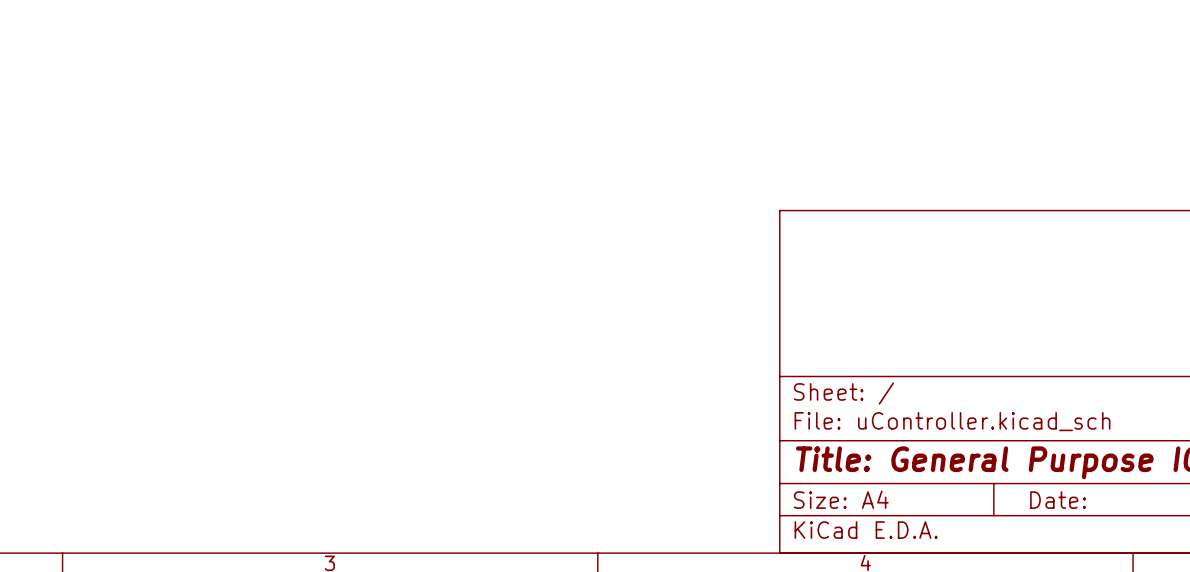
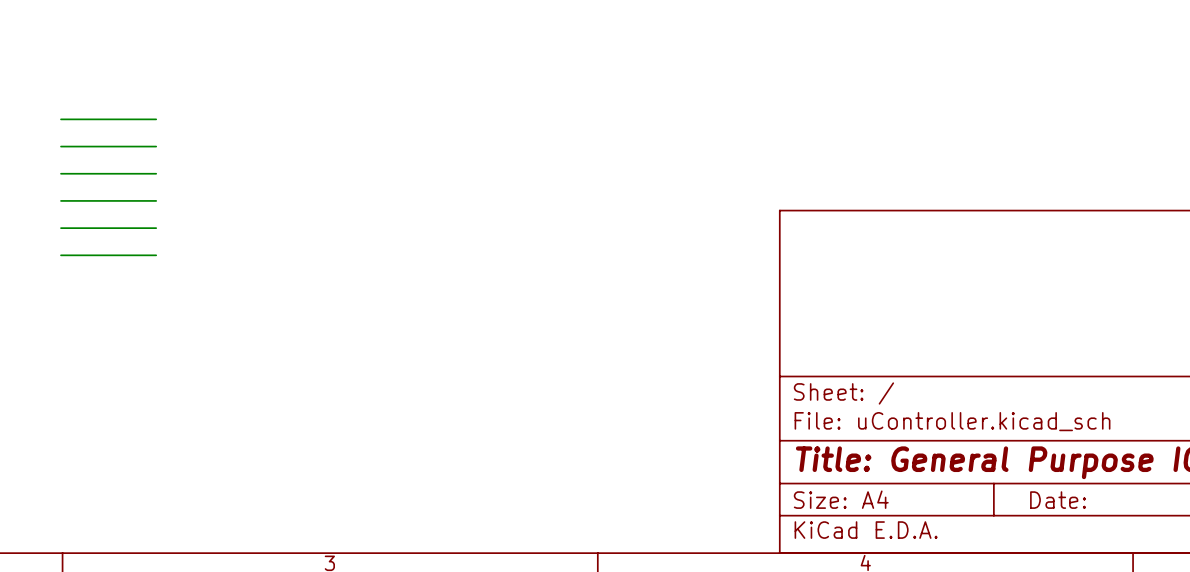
wire: none -> (61, 119) (156, 119)
wire: none -> (61, 146) (156, 146)
wire: none -> (61, 173) (156, 173)
wire: none -> (61, 200) (156, 200)
wire: none -> (61, 228) (156, 228)
wire: none -> (61, 255) (156, 255)

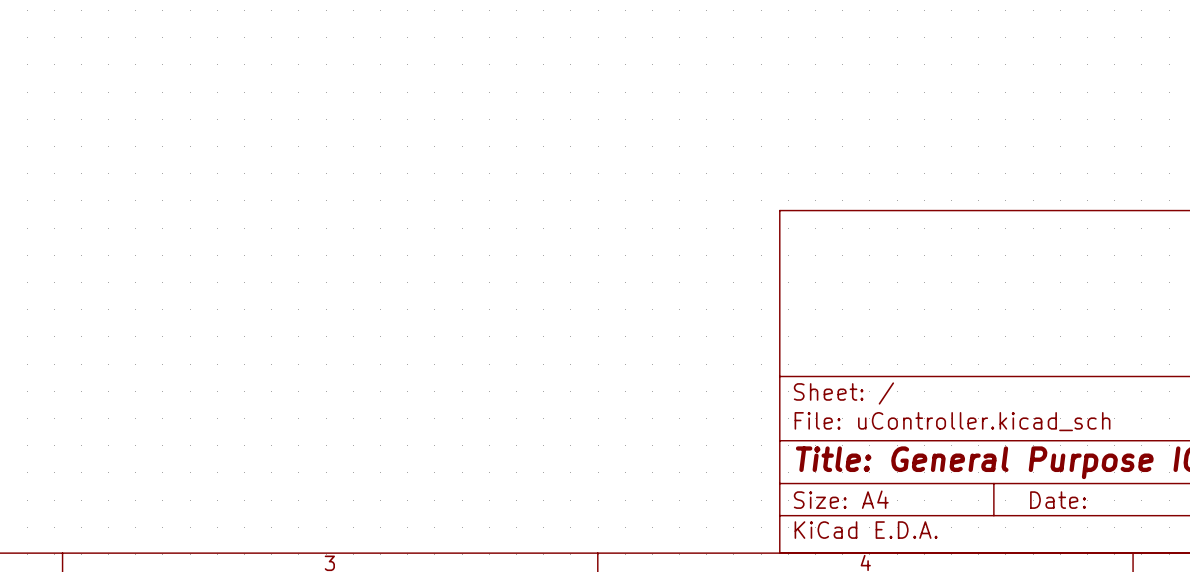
wire: (61, 119) (156, 119) -> none
wire: (61, 146) (156, 146) -> none
wire: (61, 173) (156, 173) -> none
wire: (61, 200) (156, 200) -> none
wire: (61, 228) (156, 228) -> none
wire: (61, 255) (156, 255) -> none

